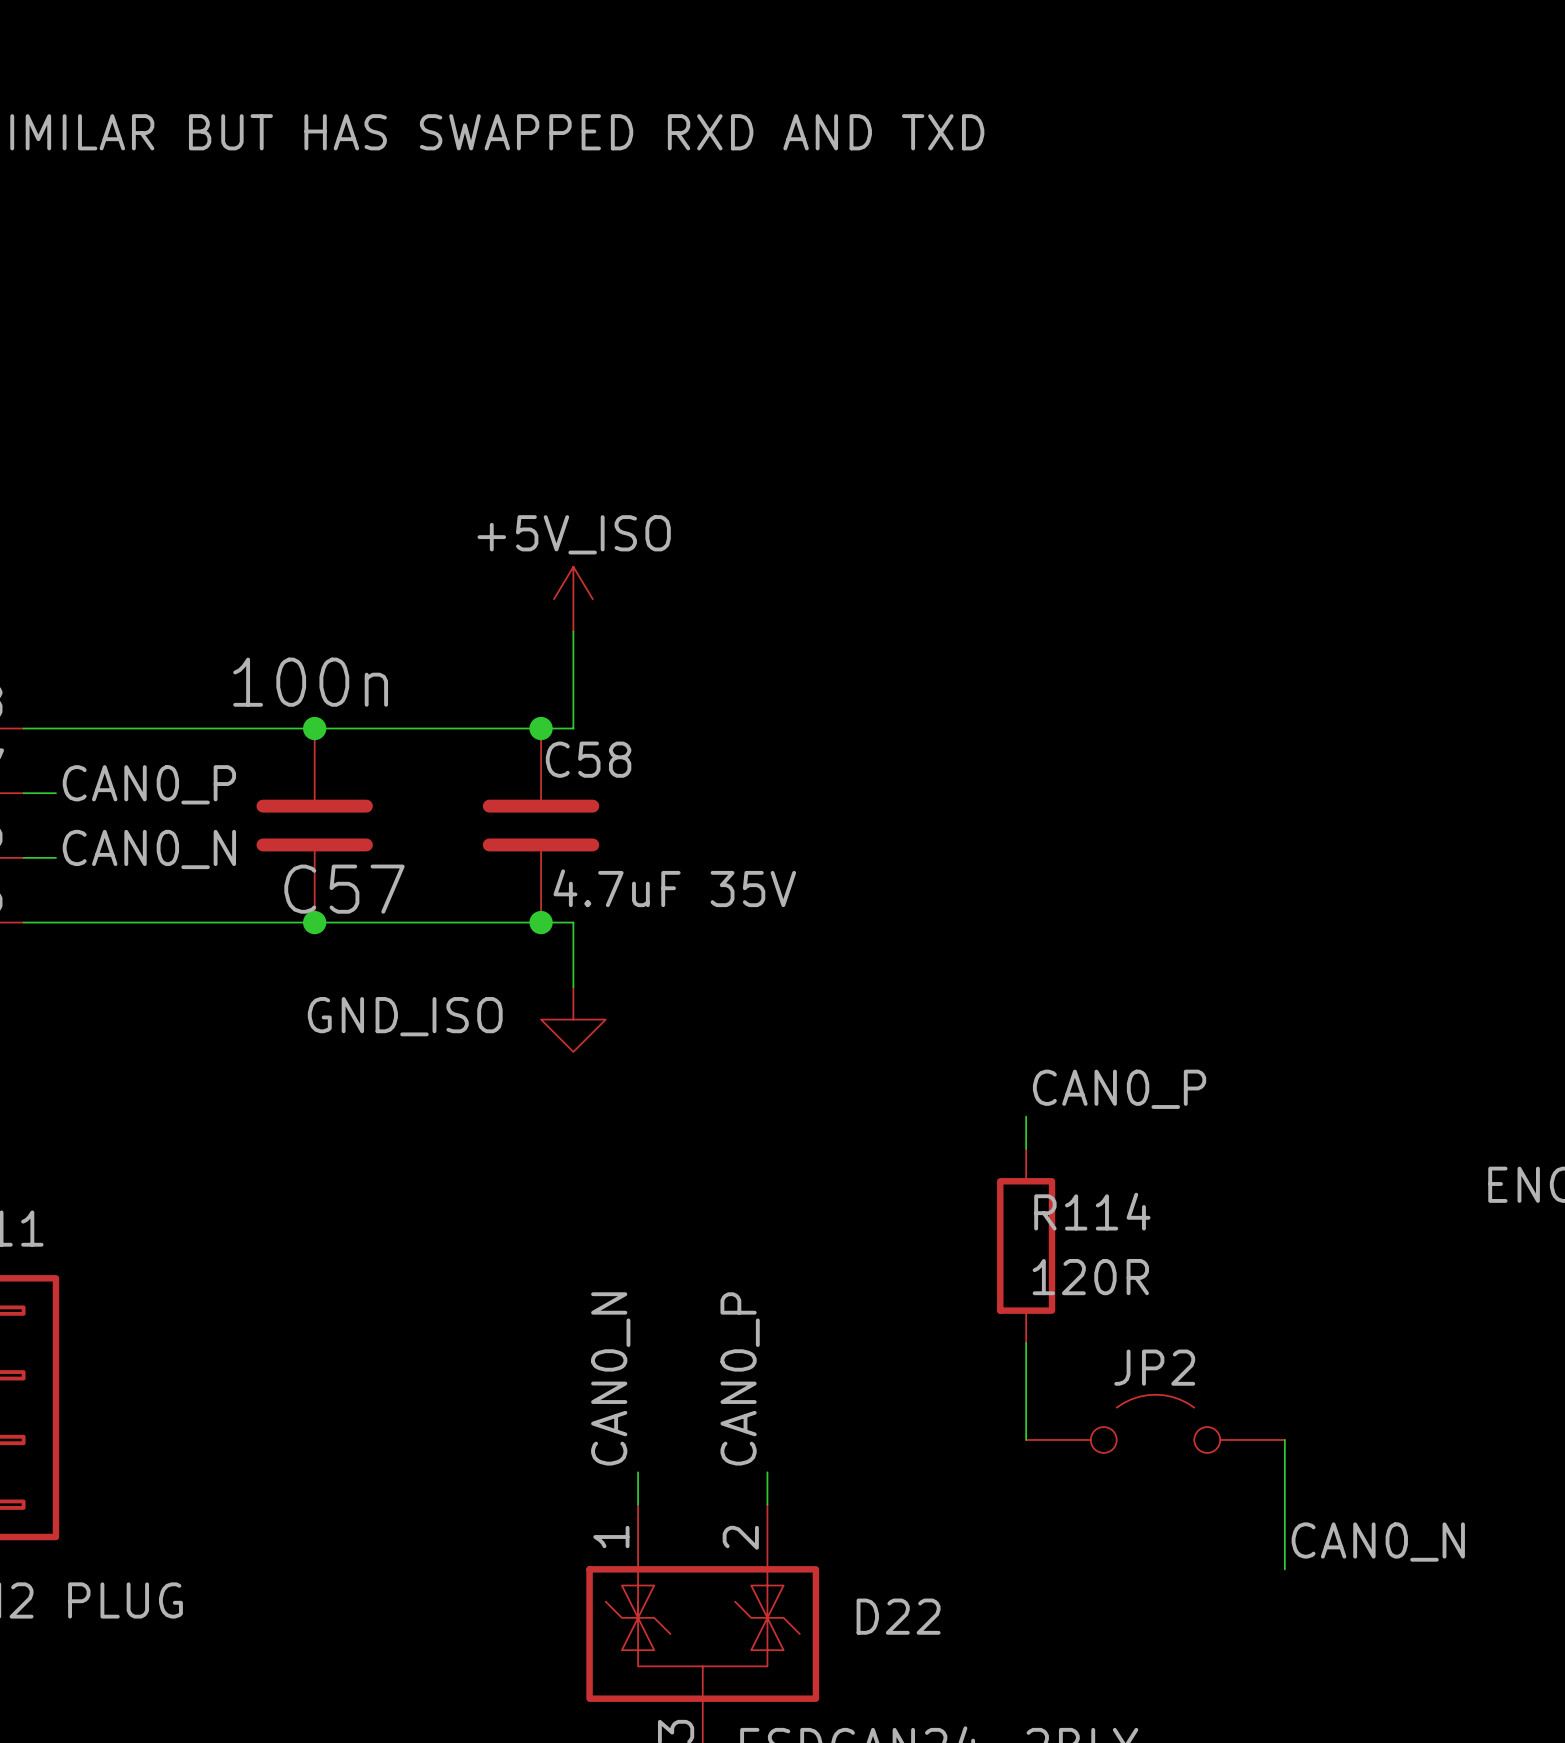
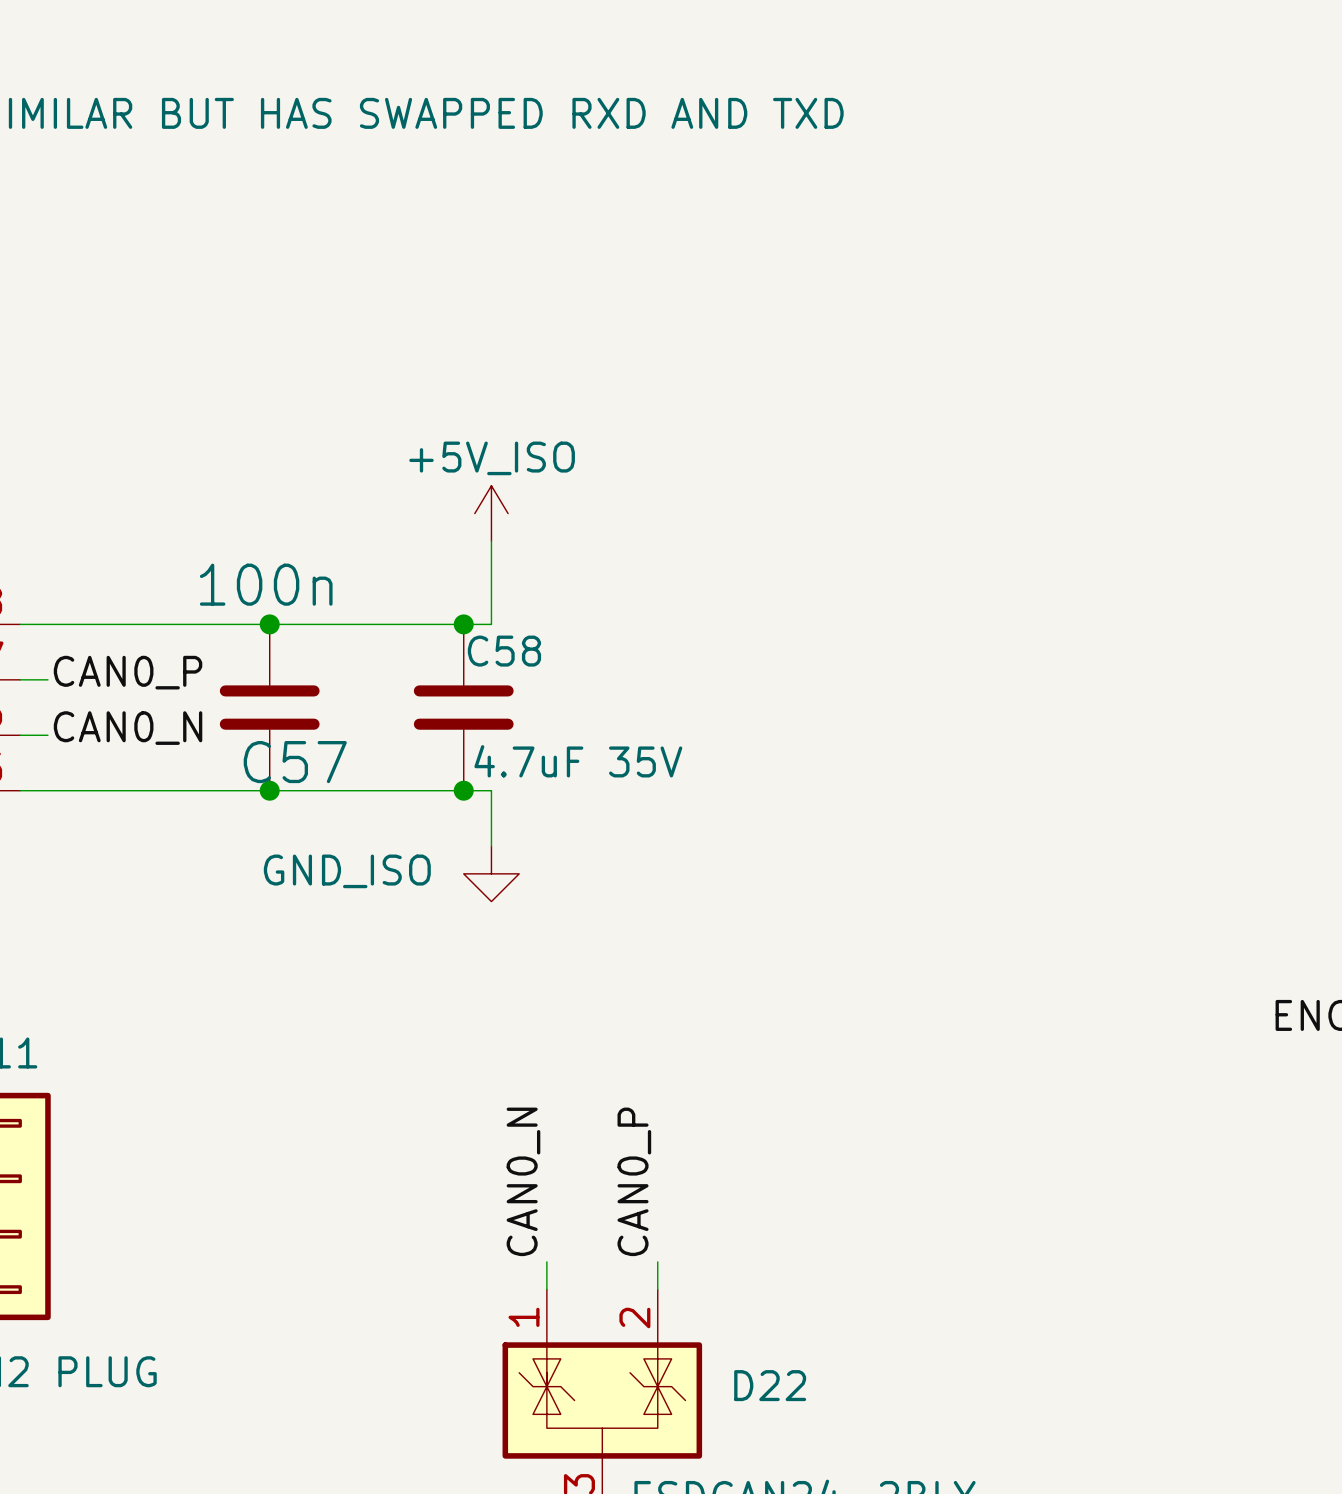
label: CAN0_P (1119, 1089) -> none
wire: (1026, 1116) (1026, 1148) -> none
R114: 120R (1026, 1245) -> none
wire: (1026, 1342) (1026, 1439) -> none
JP2: (1155, 1423) -> none
wire: (1284, 1439) (1284, 1569) -> none
label: CAN0_N (1378, 1542) -> none

